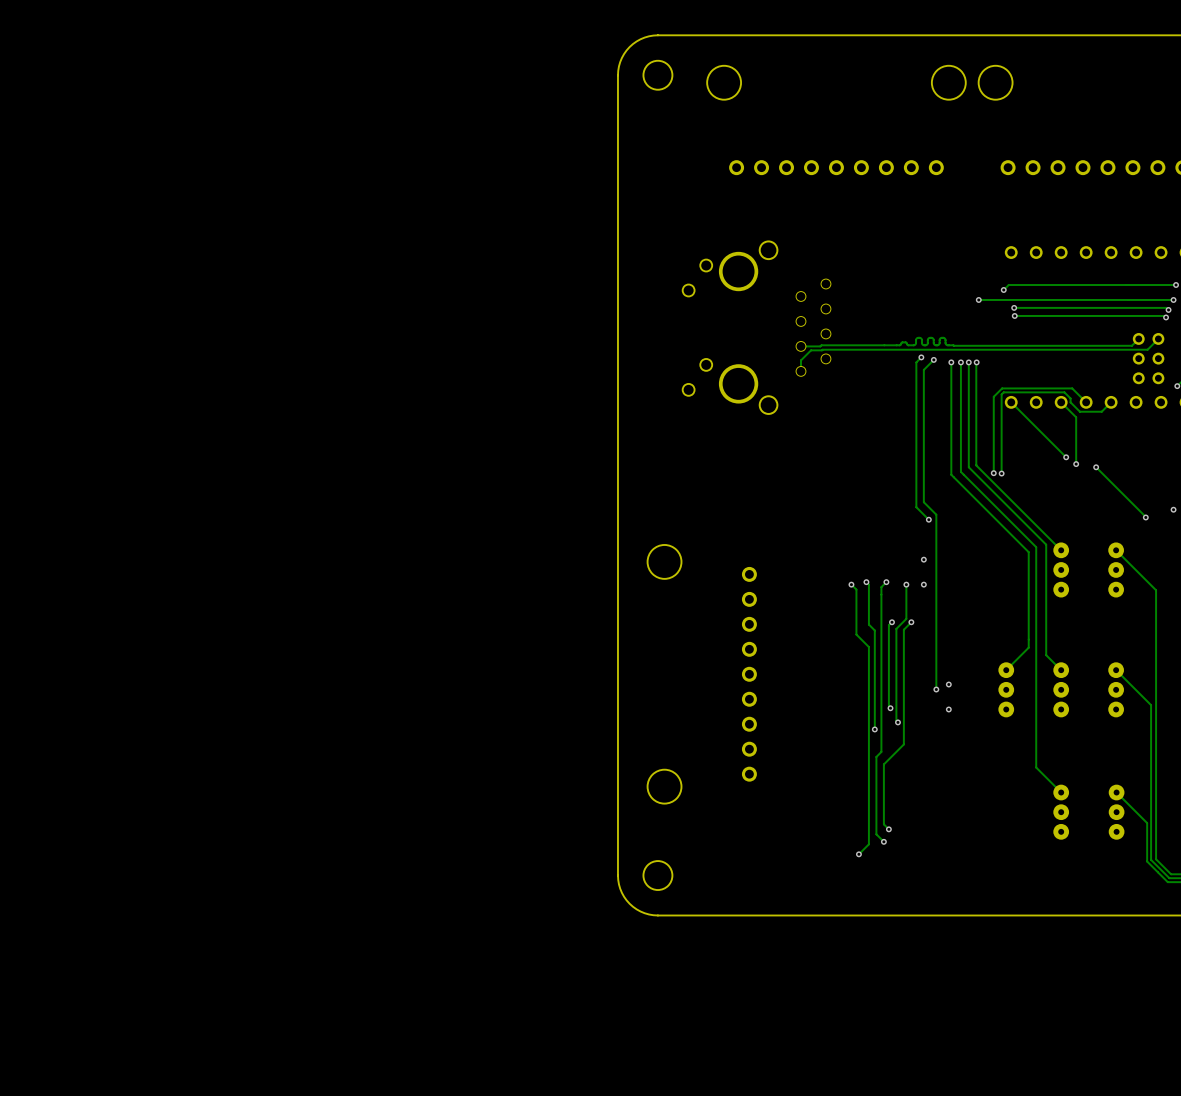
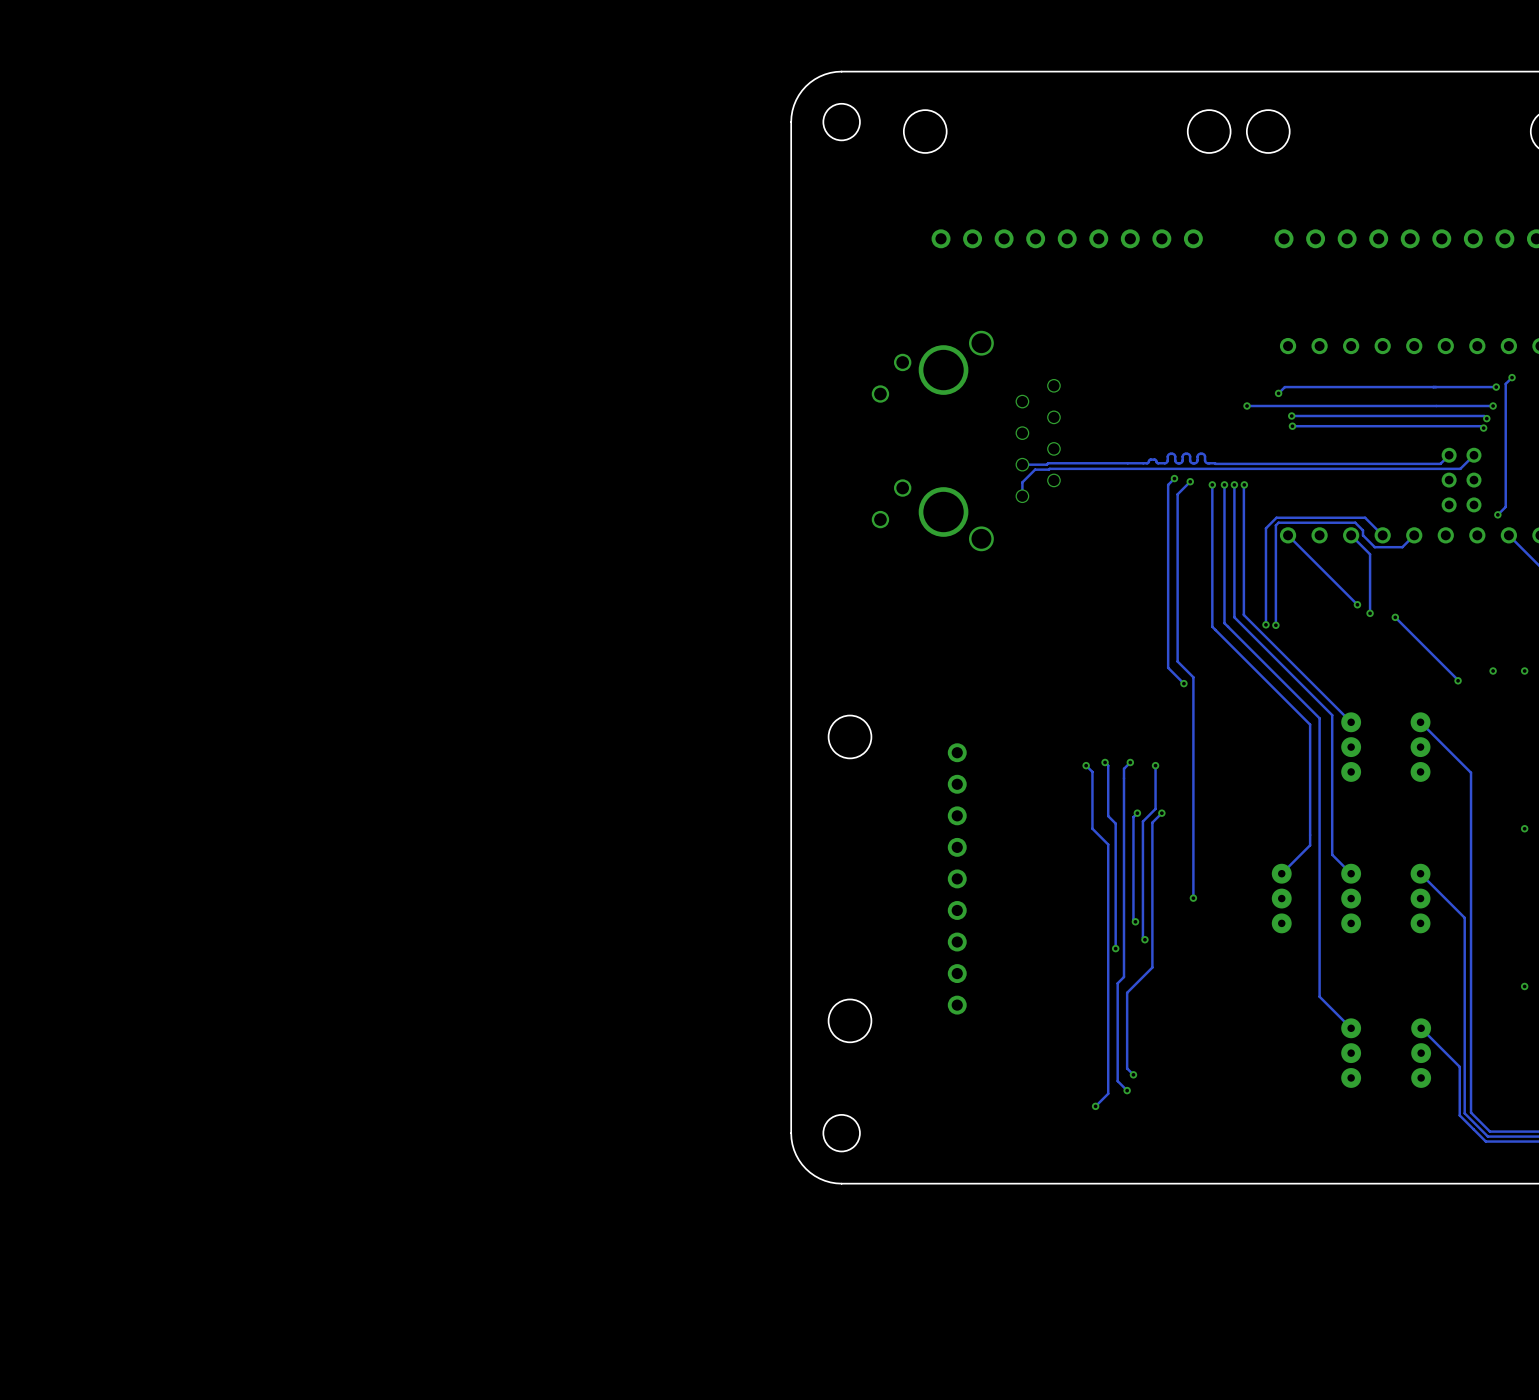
via: (923, 559) -> none
via: (923, 584) -> none
via: (948, 684) -> none
via: (948, 709) -> none

